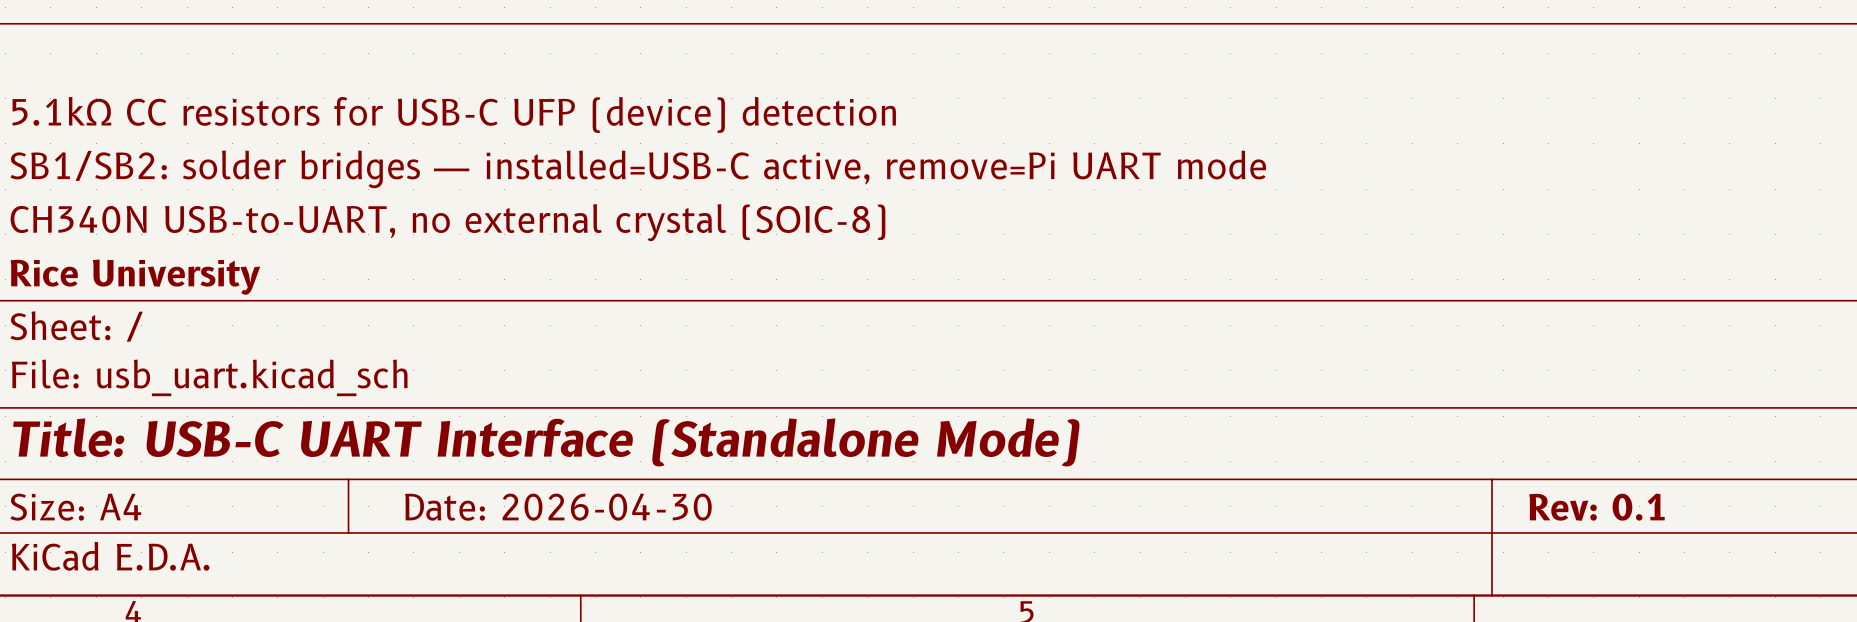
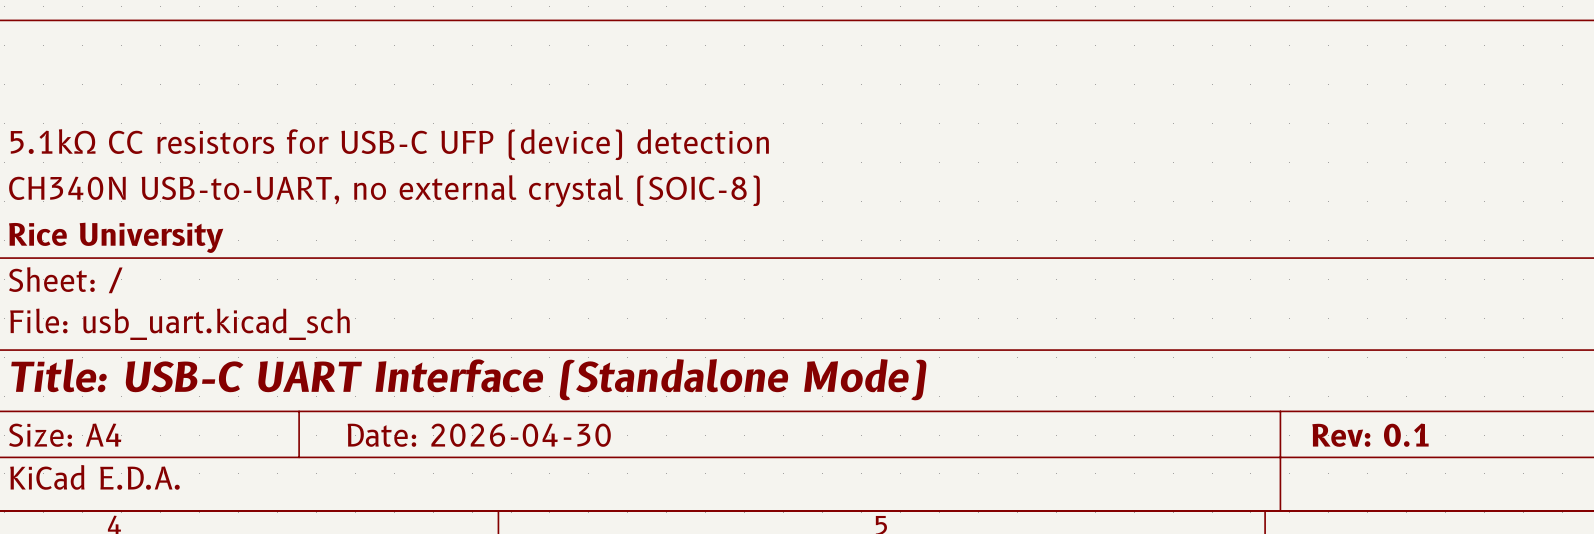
title block: 5.1kΩ CC resistors for USB-C UFP (device) detection (454, 114) -> none
title block: SB1/SB2: solder bridges — installed=USB-C active, remove=Pi UART mode (638, 169) -> 5.1kΩ CC resistors for USB-C UFP (device) detection (389, 144)

